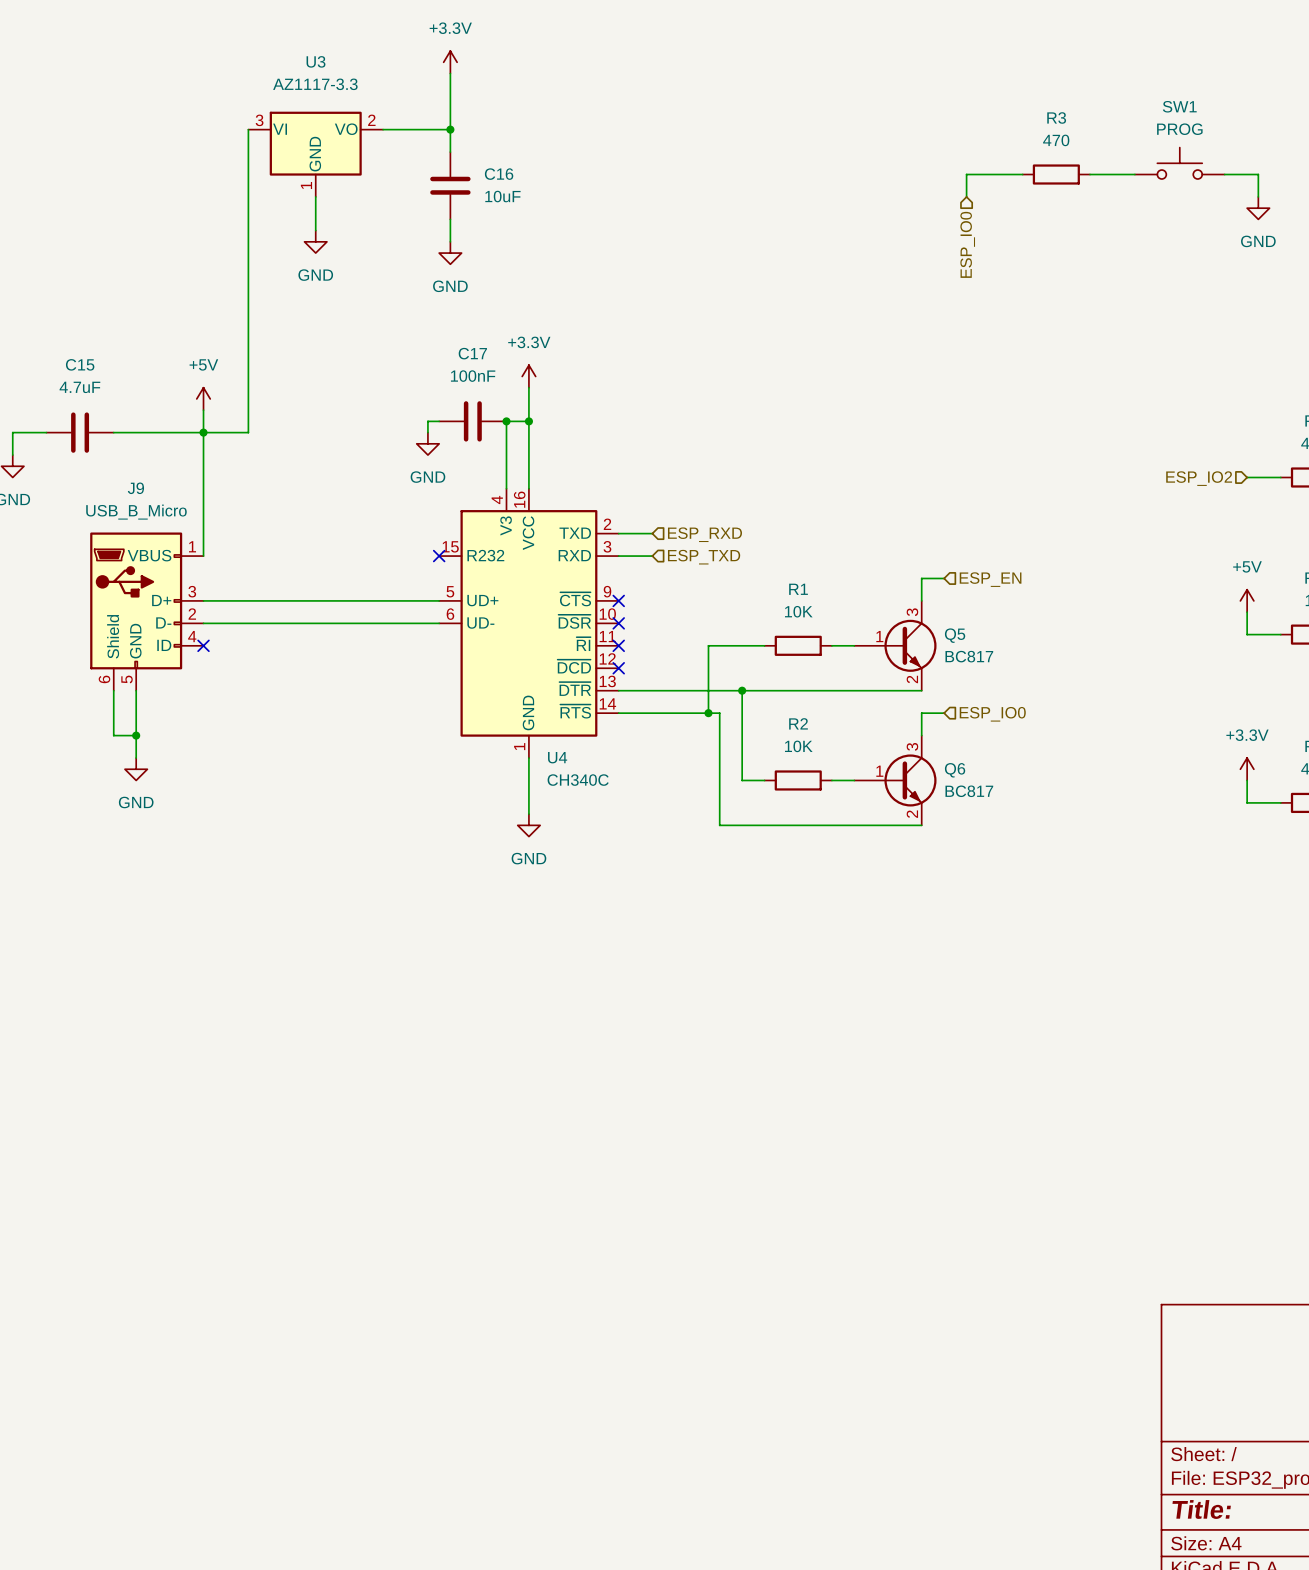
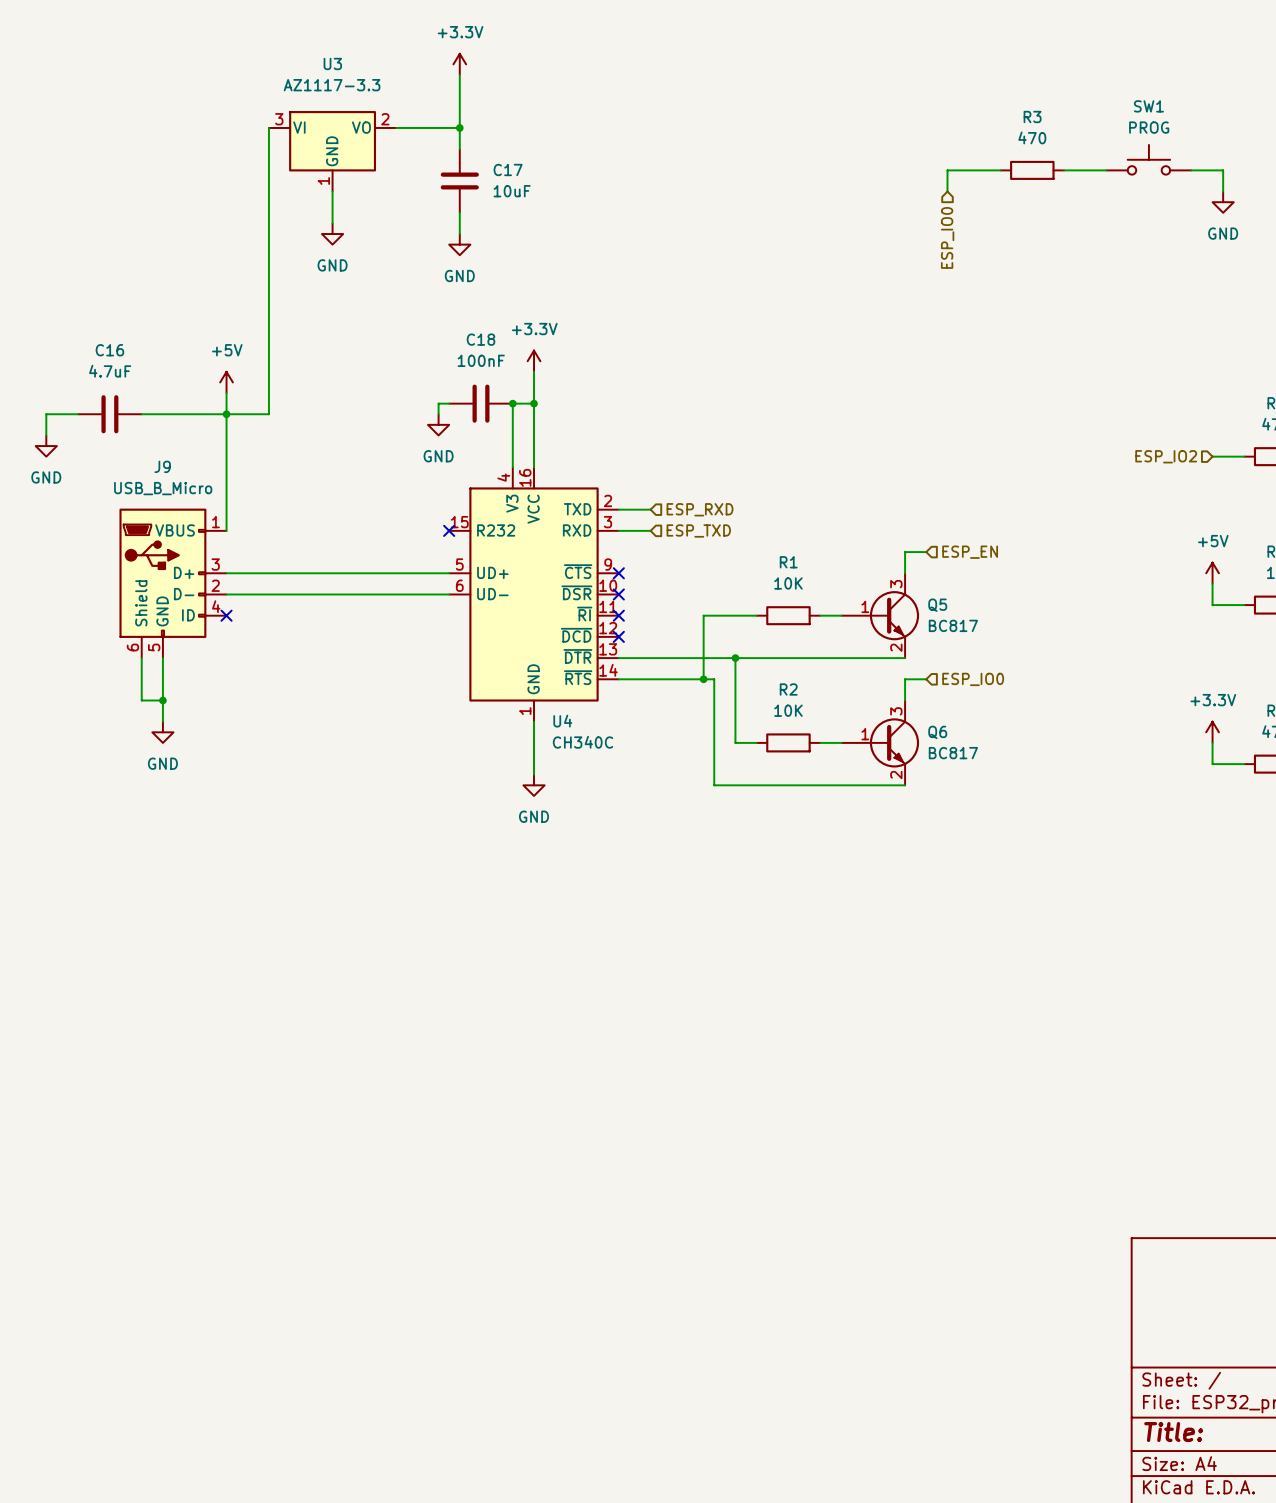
C16 name: C16 (499, 174) -> C17 (508, 169)
C17 name: C17 (472, 353) -> C18 (480, 339)
C15 name: C15 (80, 364) -> C16 (109, 350)

